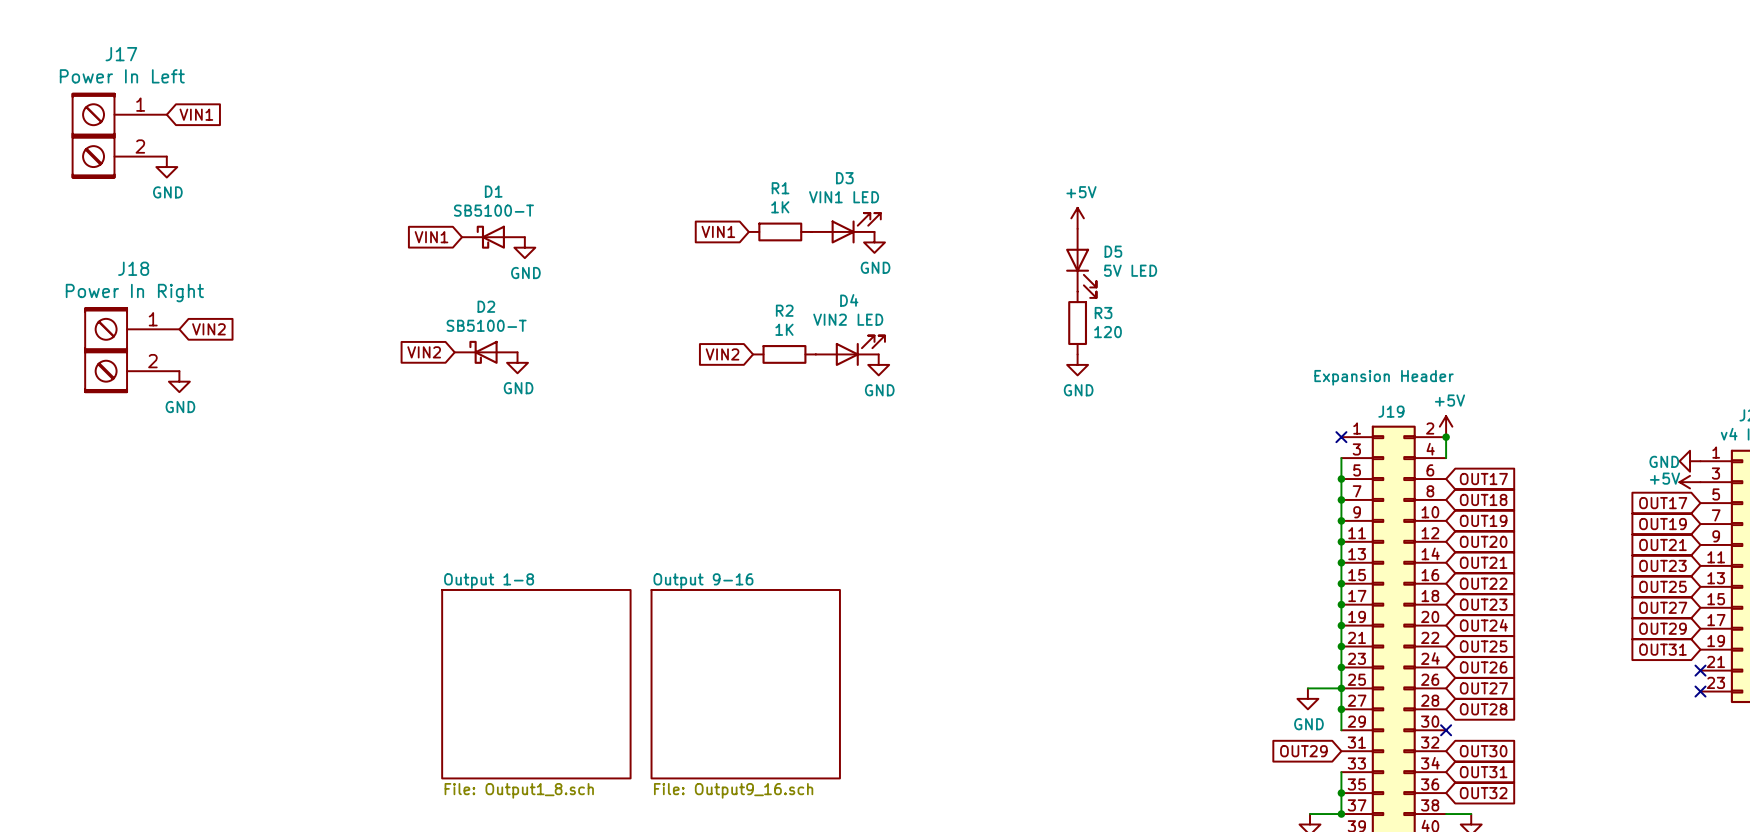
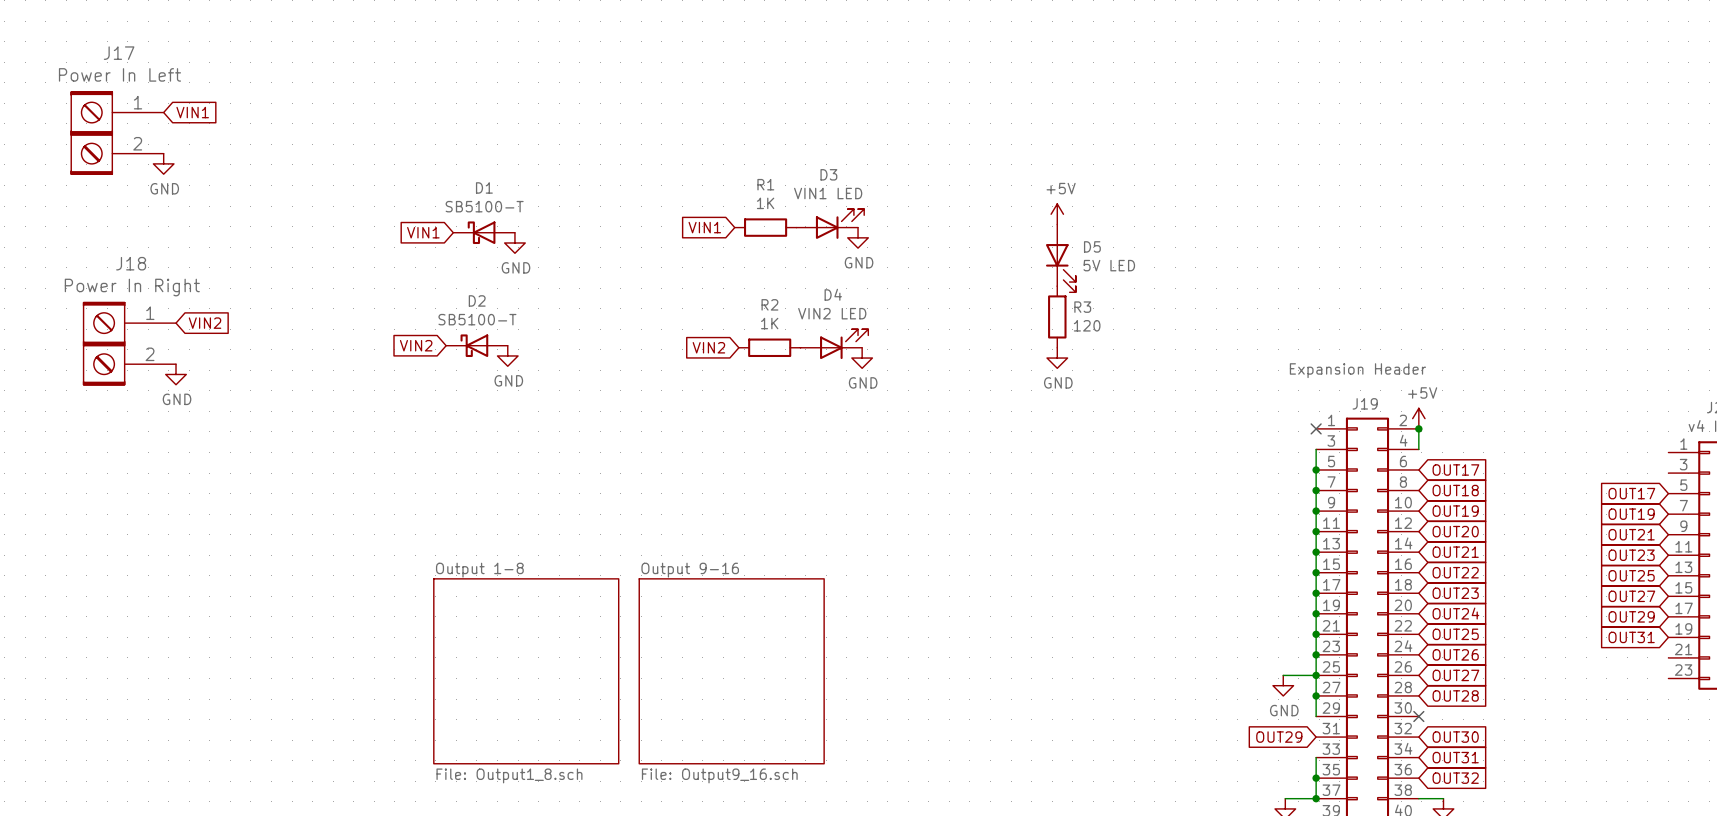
power symbol: GND (1690, 461) -> none
power symbol: +5V (1690, 482) -> none
no-connect mark: (1700, 670) -> none
no-connect mark: (1700, 691) -> none

